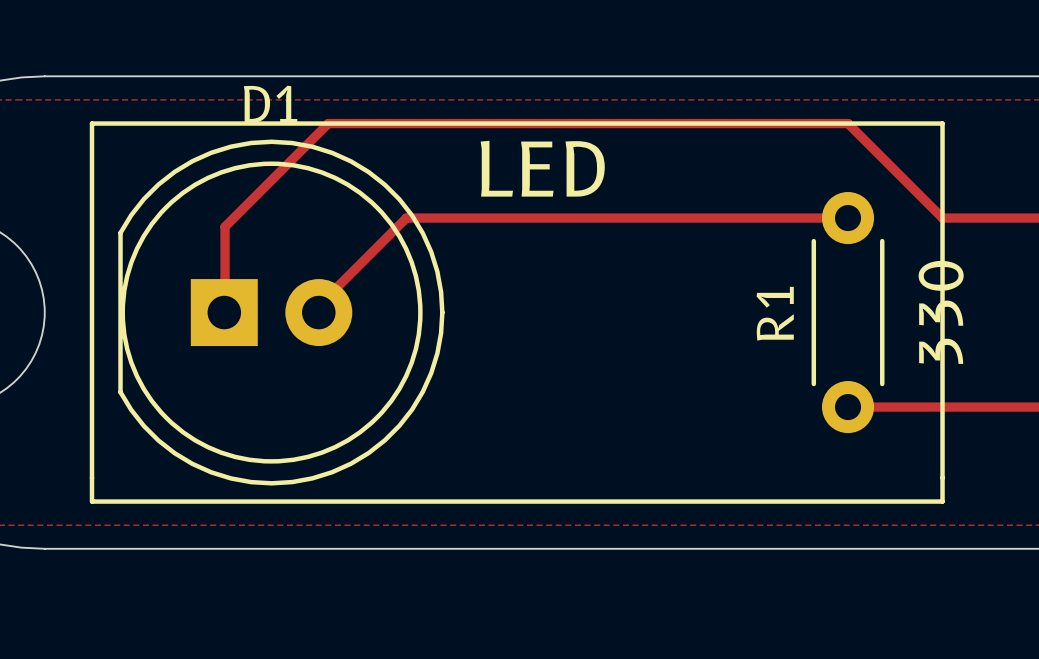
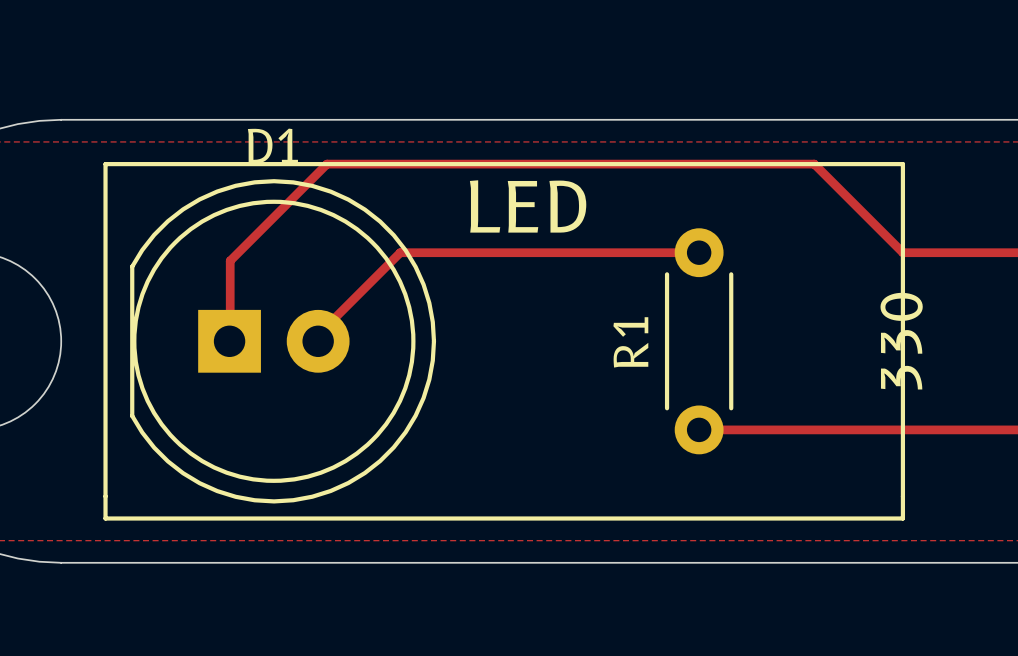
top track: (725, 218) (848, 218) -> (699, 429) (814, 429)
R1 position: (848, 312) -> (699, 341)

